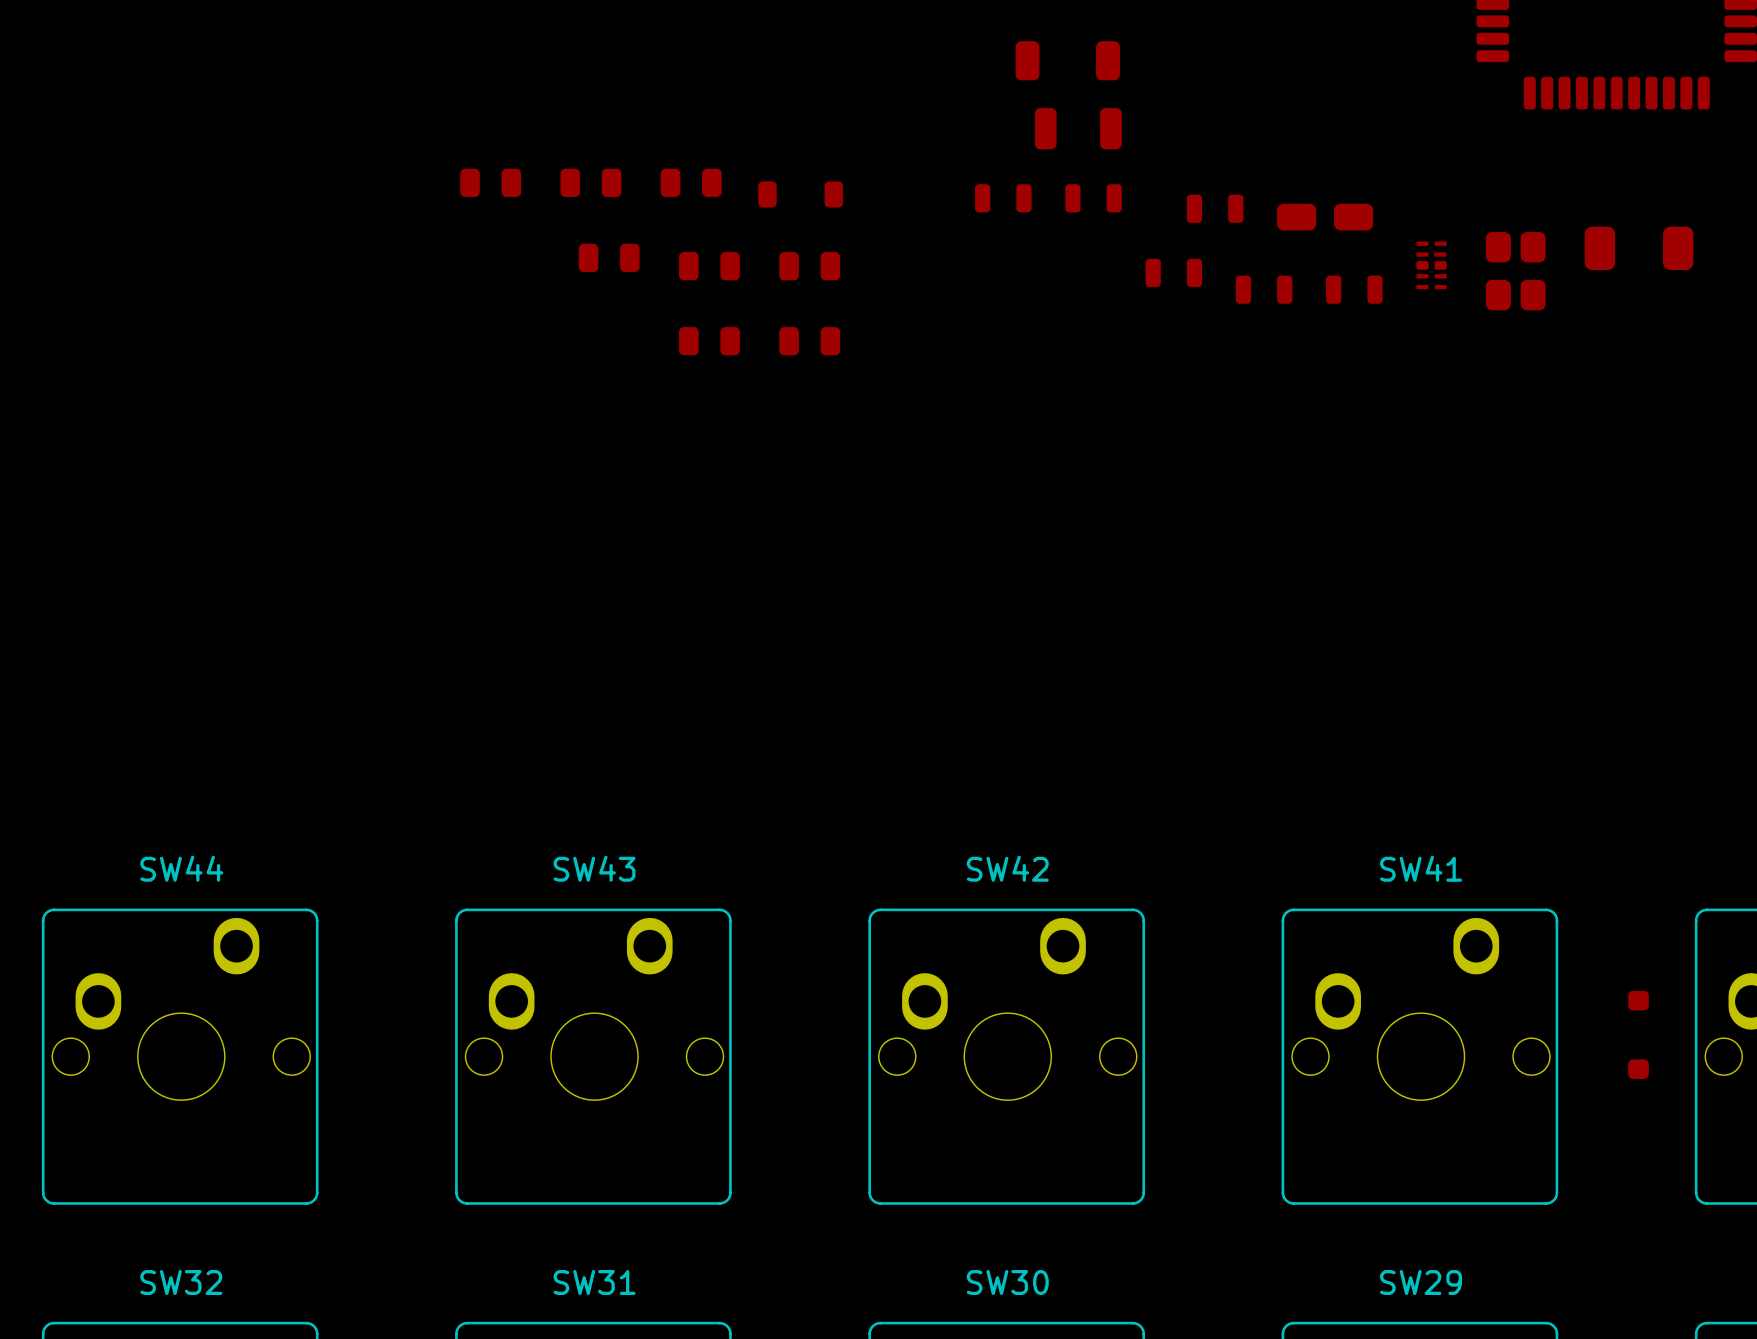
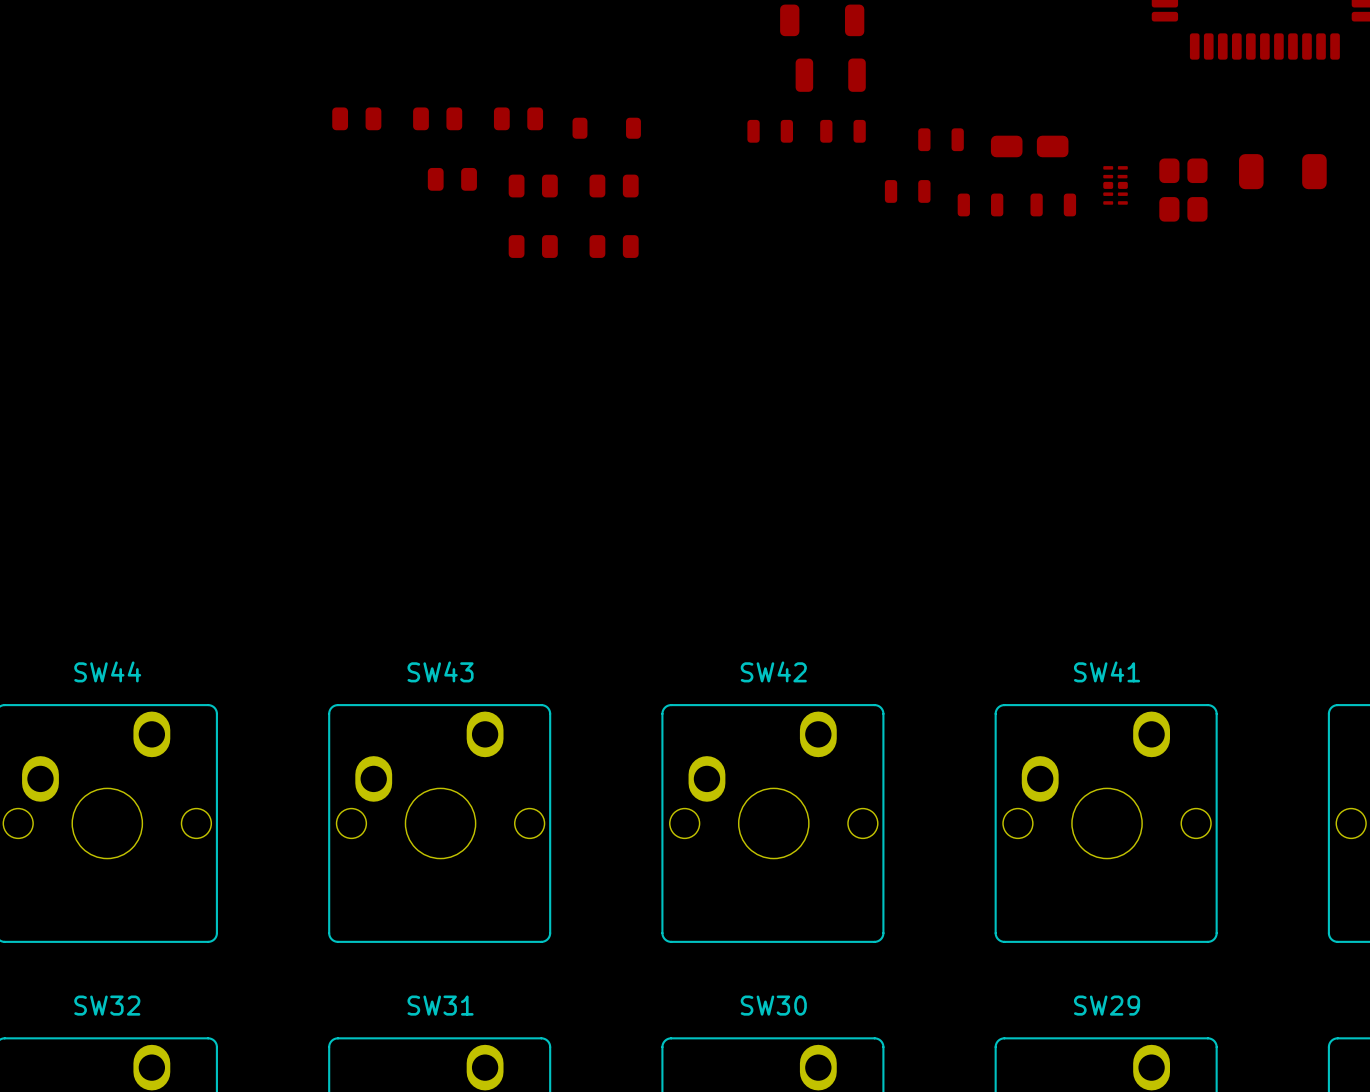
part: (1638, 1034) -> none

